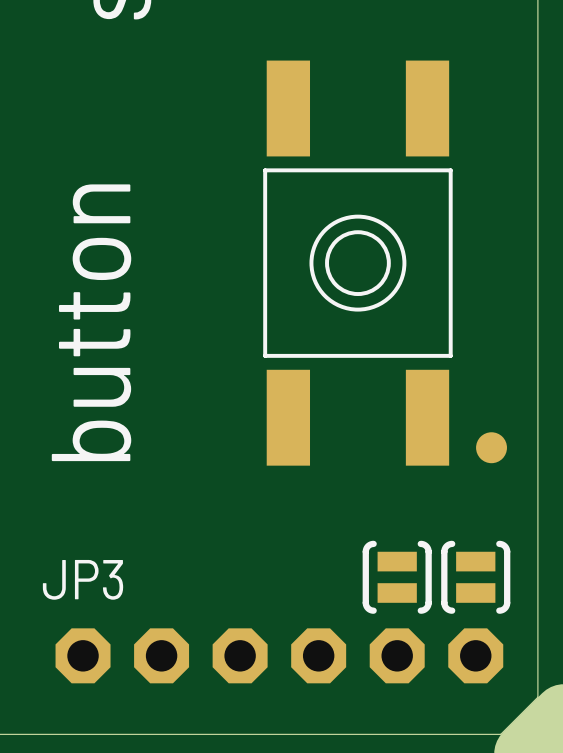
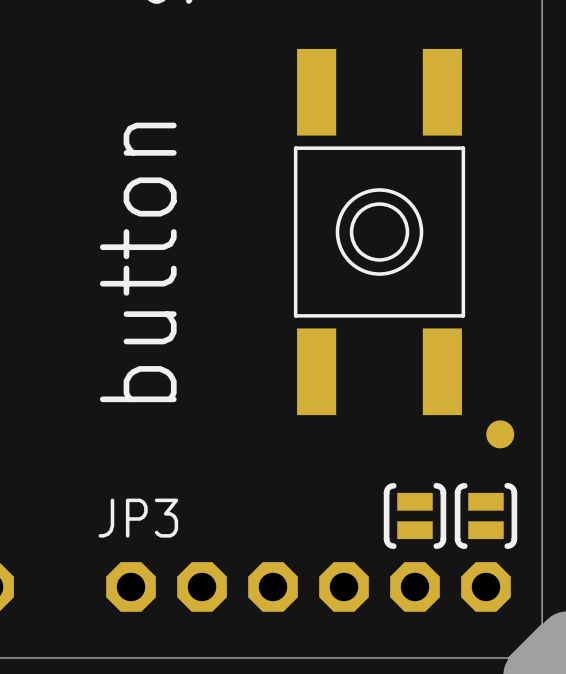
part position: (491, 447) -> (500, 434)

